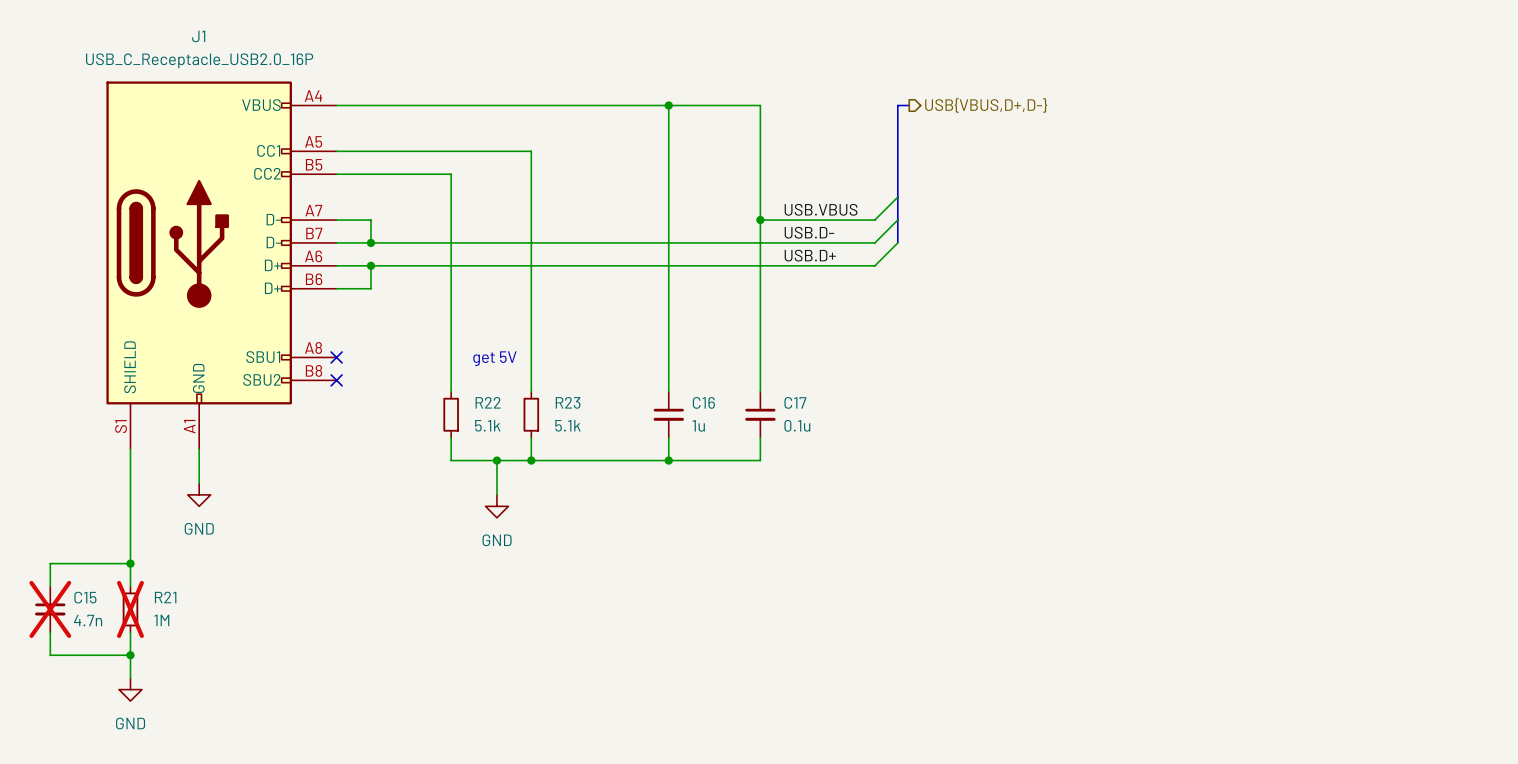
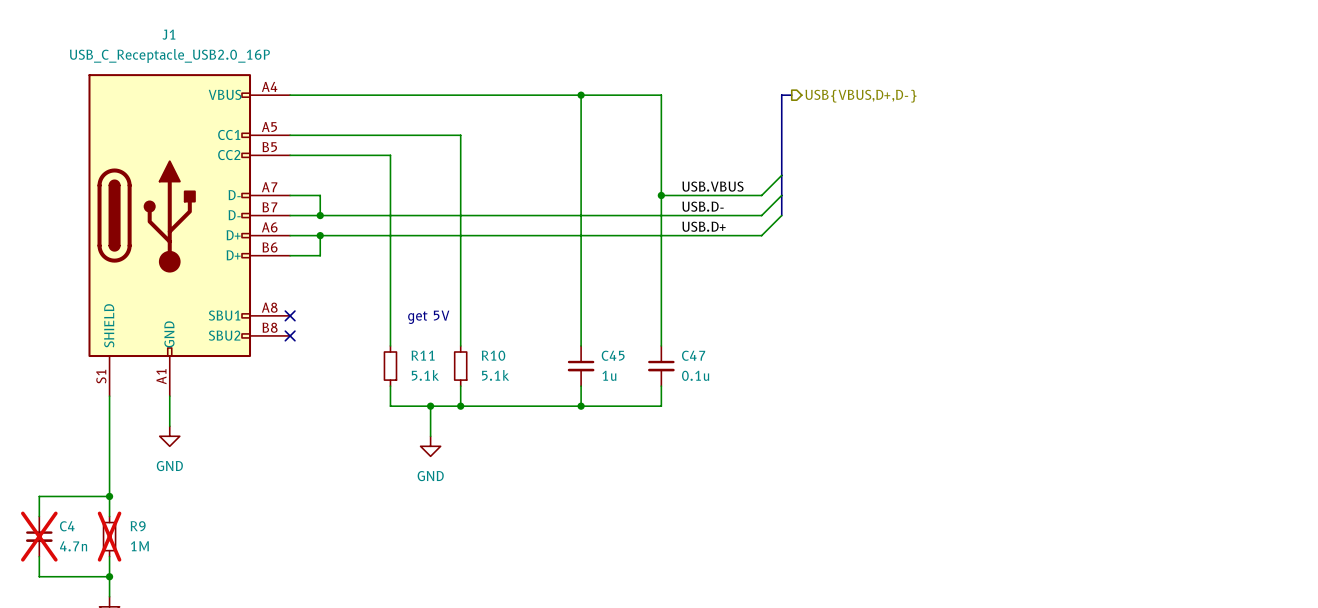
R22 name: R22 (488, 402) -> R11 (423, 355)
R23 name: R23 (568, 402) -> R10 (493, 355)
C16 name: C16 (703, 402) -> C45 (613, 355)
C17 name: C17 (795, 402) -> C47 (693, 355)
C15 name: C15 (85, 597) -> C4 (67, 526)
R21 name: R21 (165, 597) -> R9 (138, 526)

